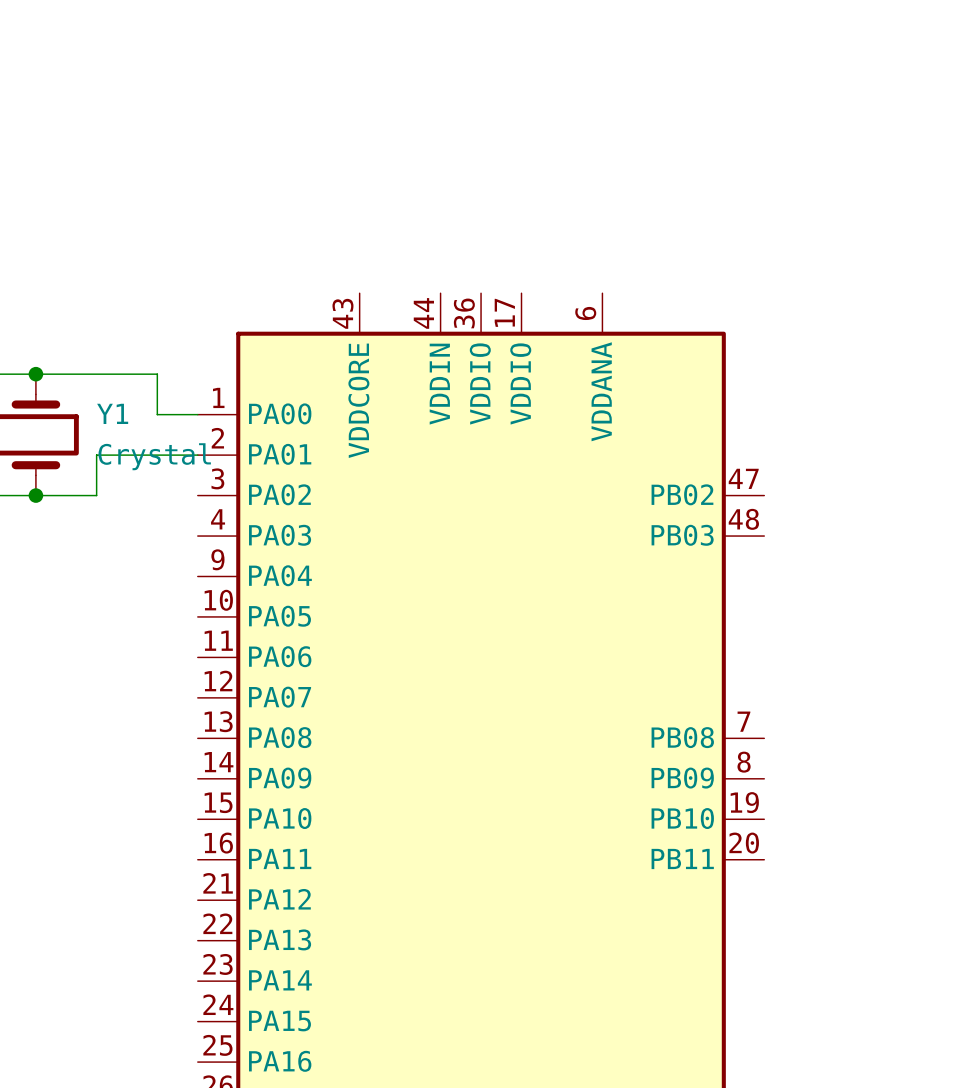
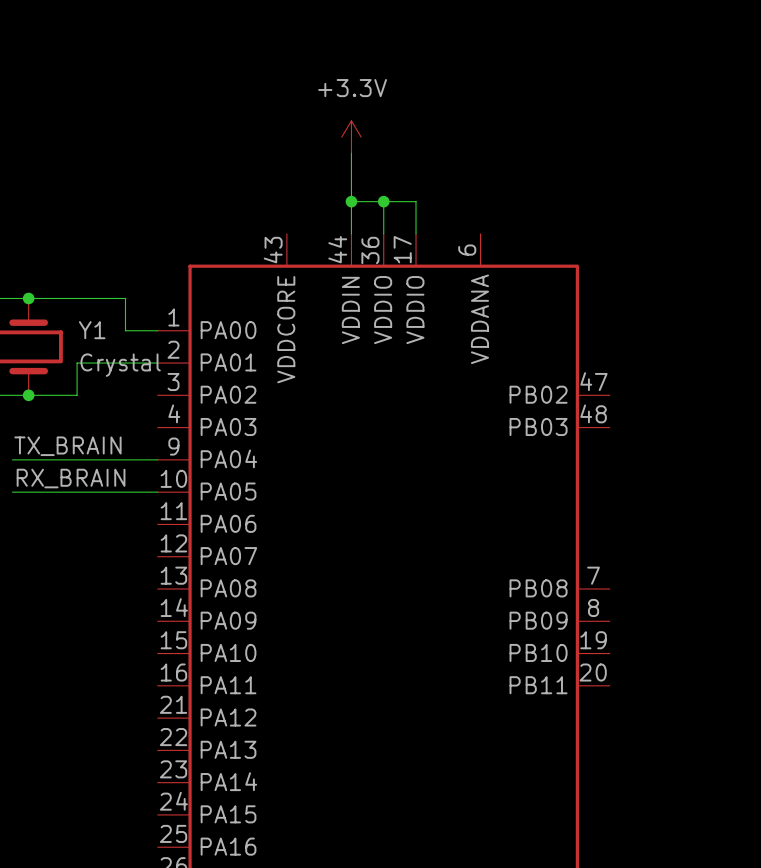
power symbol: none -> +3.3V (351, 137)
wire: none -> (351, 153) (351, 233)
wire: none -> (351, 201) (416, 201) (416, 233)
junction: none -> (351, 201)
wire: none -> (383, 201) (383, 233)
junction: none -> (383, 201)
label: none -> TX_BRAIN (67, 446)
wire: none -> (12, 459) (157, 459)
label: none -> RX_BRAIN (71, 478)
wire: none -> (12, 492) (157, 492)

